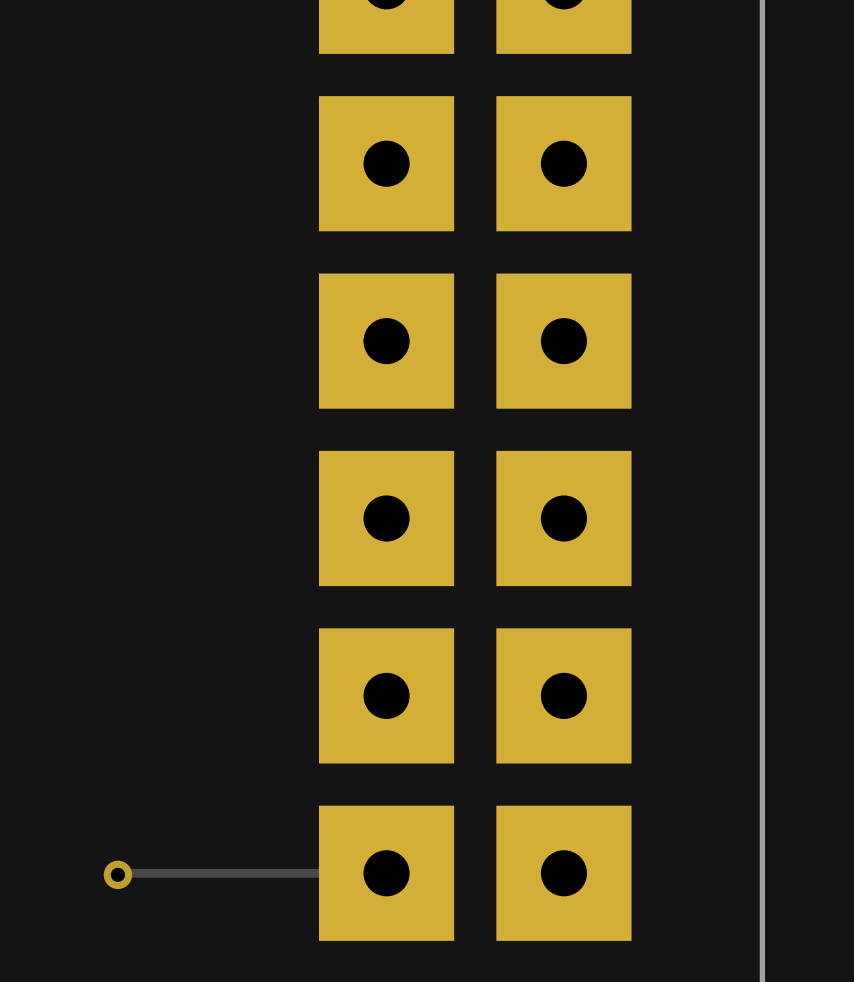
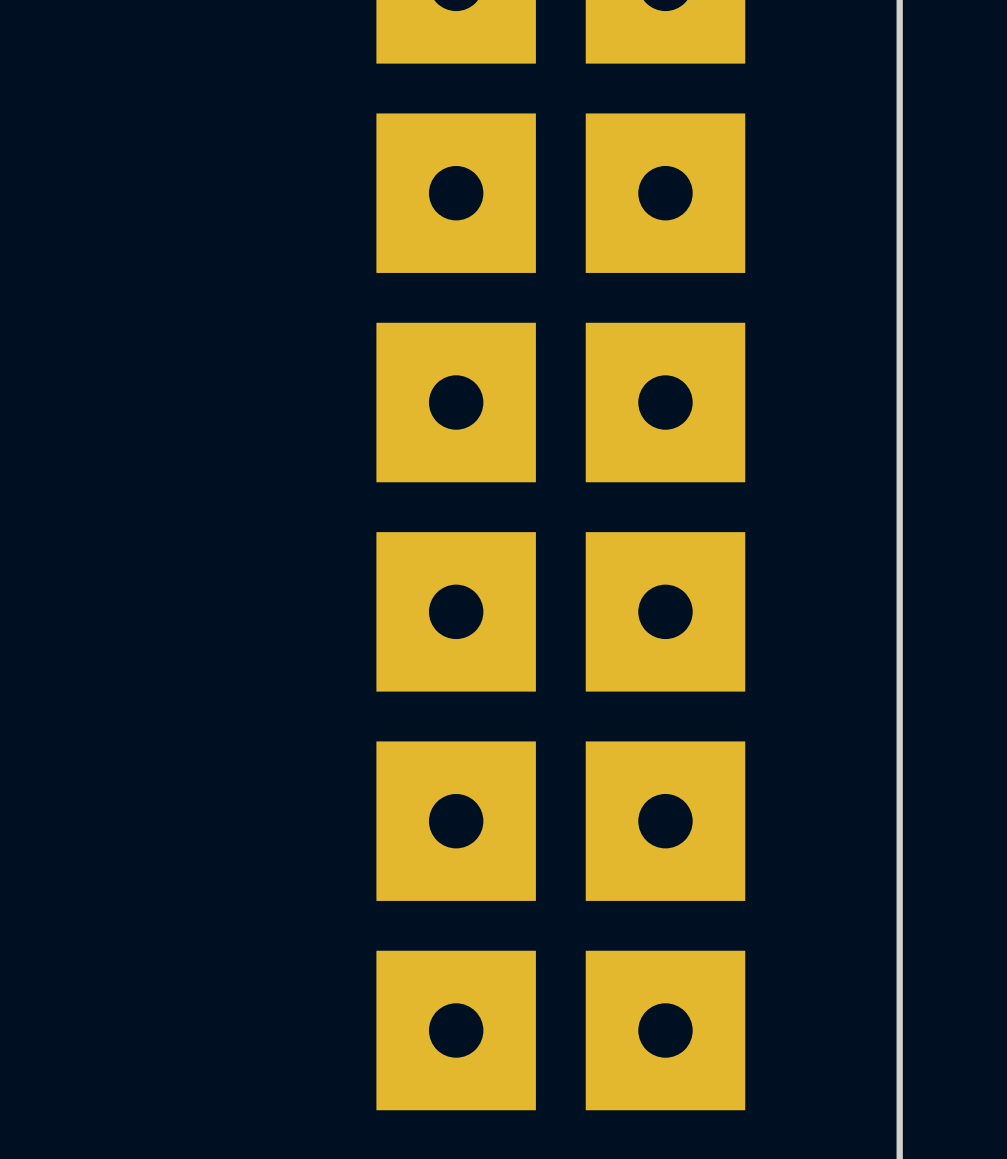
track: (386, 873) (119, 873) (117, 874) -> none
via: (117, 874) -> none

